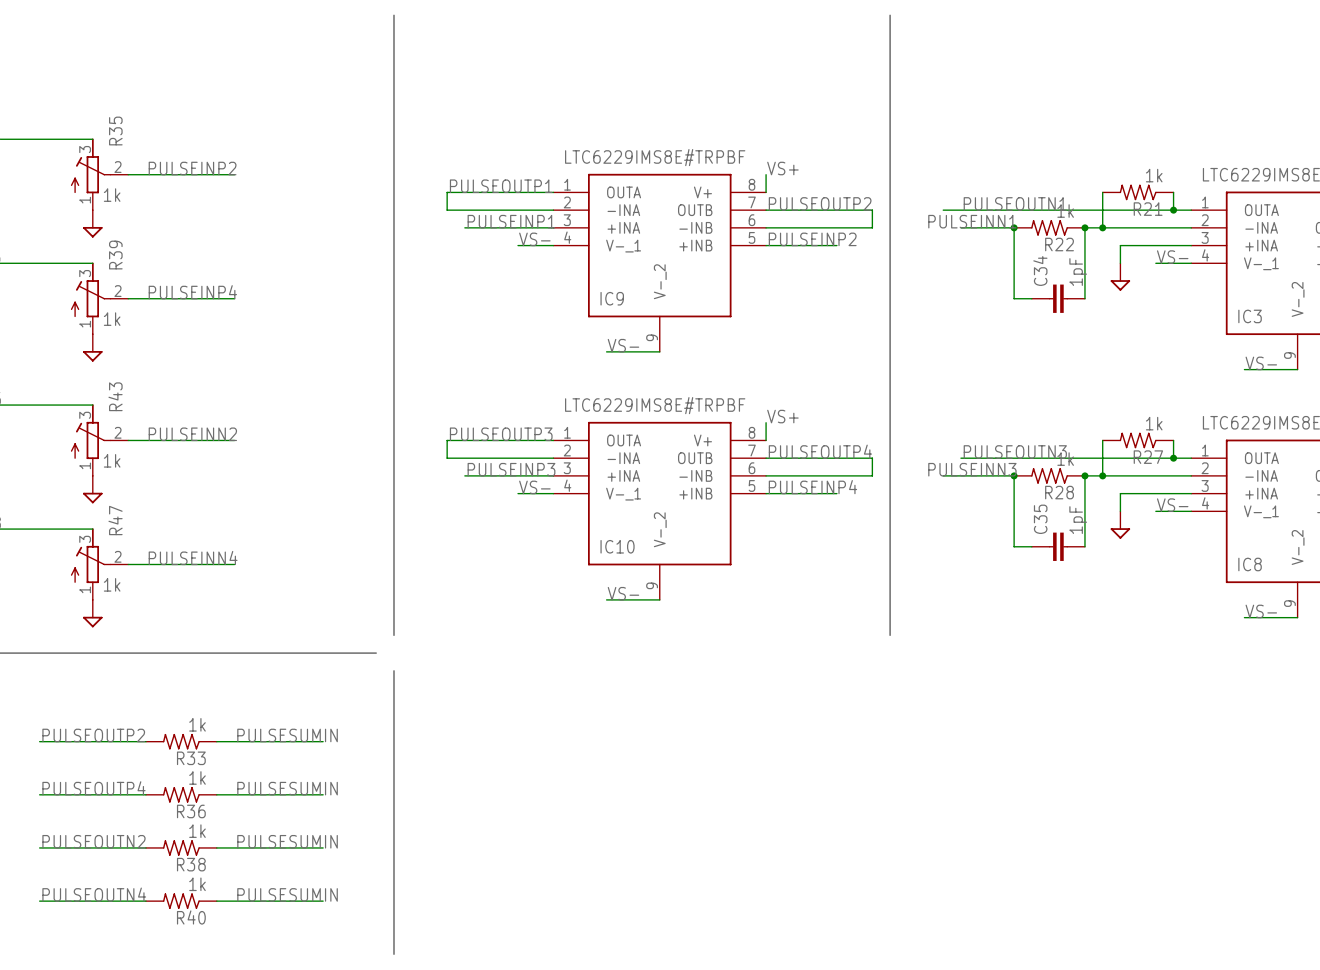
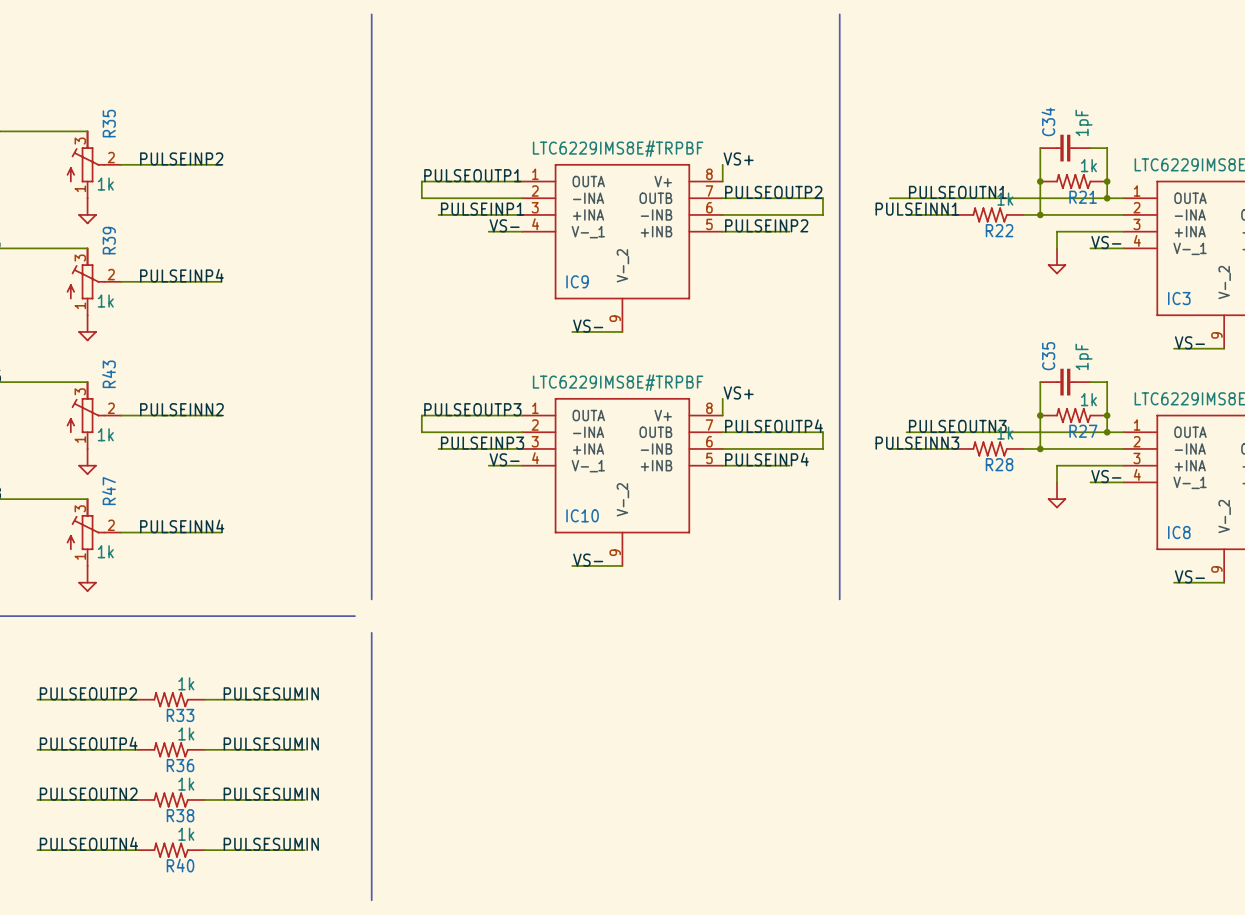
wire: none -> (1040, 148) (1040, 181)
wire: none -> (1090, 148) (1107, 148) (1107, 181)
junction: none -> (1107, 181)
wire: (1014, 227) (1014, 298) (1031, 298) -> none
junction: (1014, 227) -> none
wire: (1084, 227) (1084, 298) -> none
junction position: (1084, 227) -> (1040, 181)
C34 position: (1058, 298) -> (1065, 148)
wire: none -> (1040, 382) (1040, 415)
wire: none -> (1090, 382) (1107, 382) (1107, 415)
junction: none -> (1107, 415)
wire: (1014, 475) (1014, 546) (1031, 546) -> none
junction: (1014, 475) -> none
wire: (1084, 475) (1084, 546) -> none
junction position: (1084, 475) -> (1040, 415)
C35 position: (1058, 546) -> (1065, 382)

